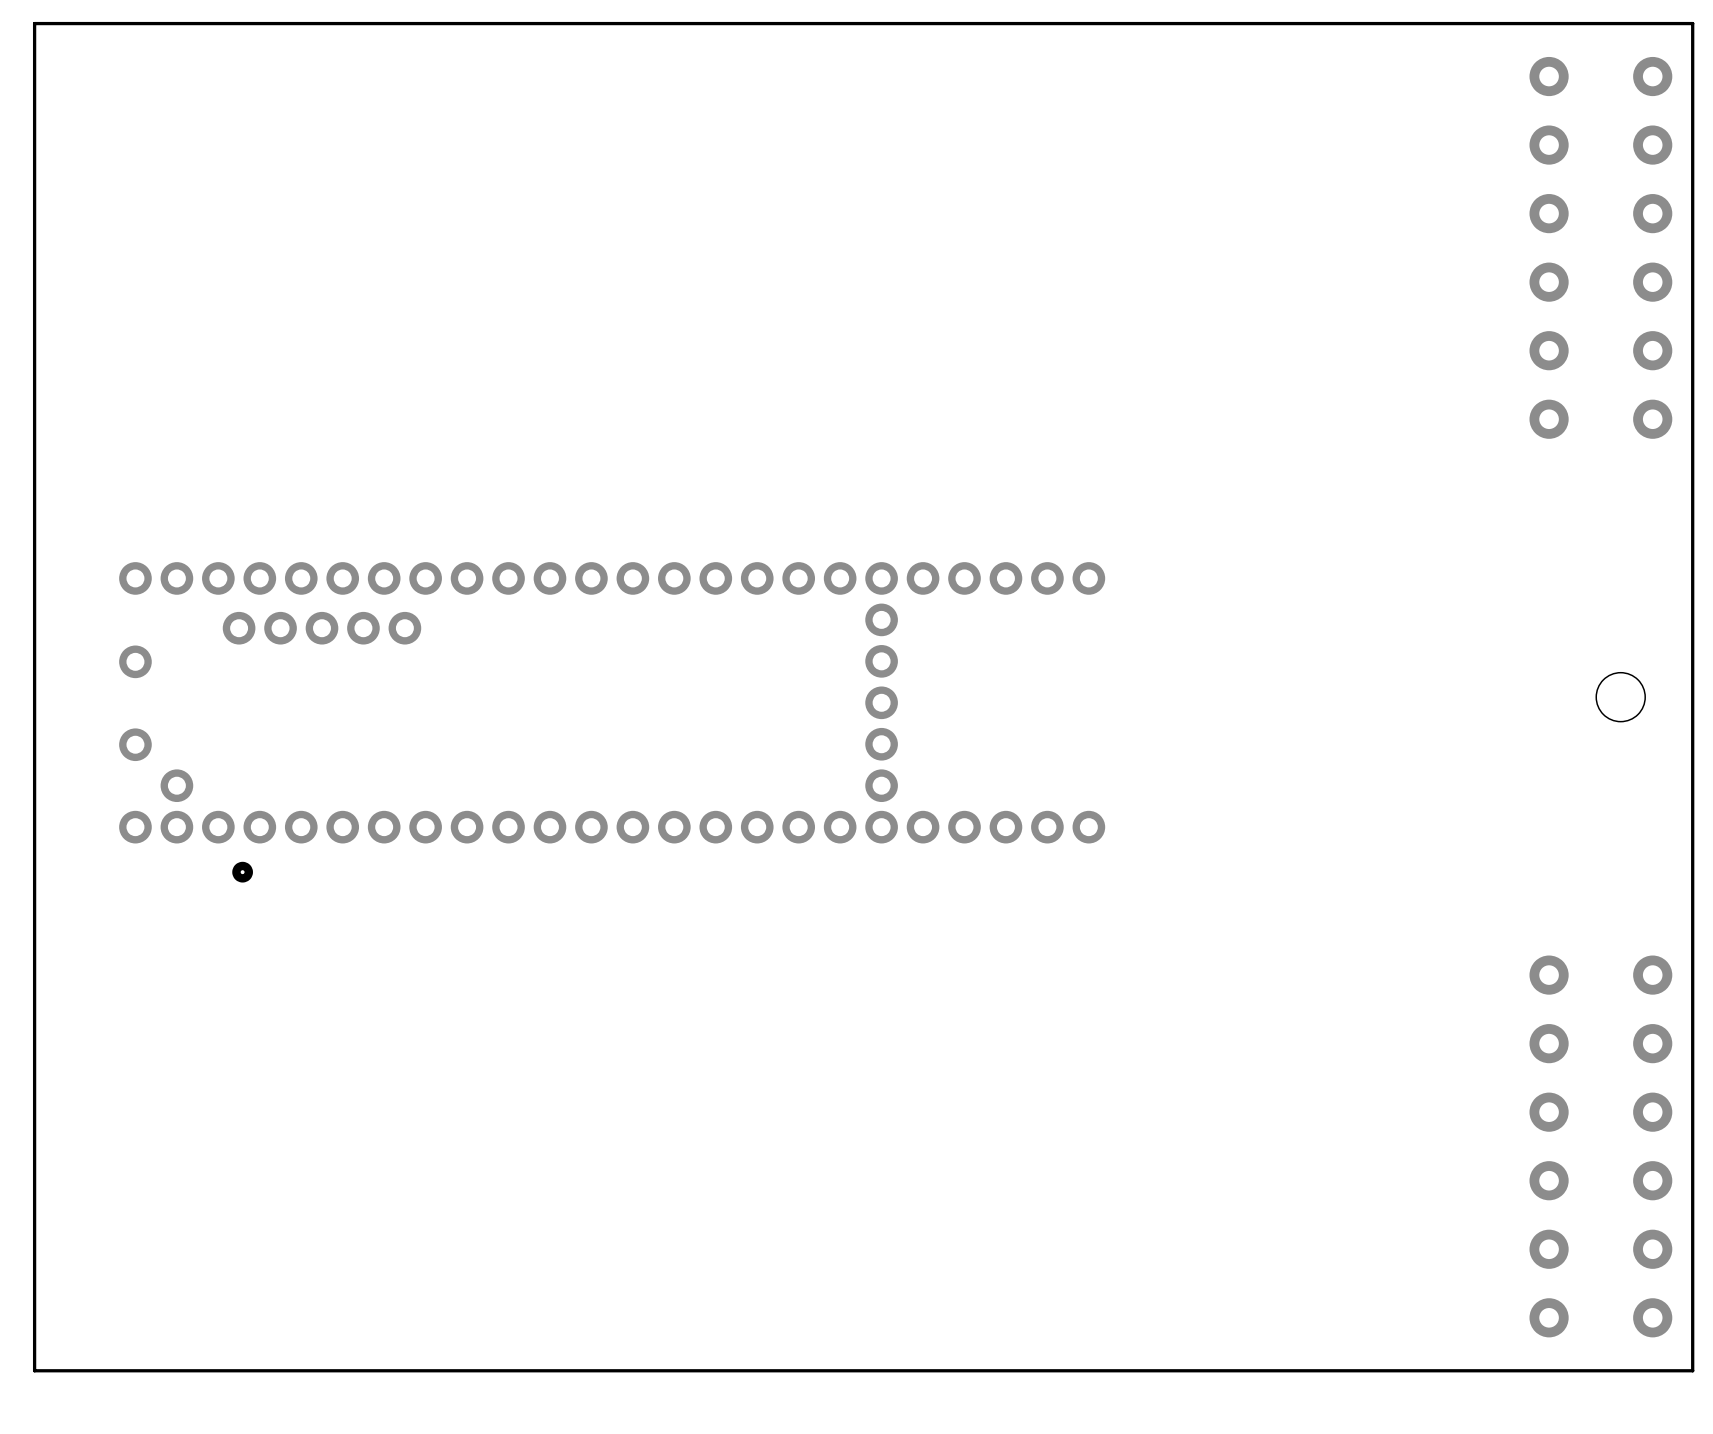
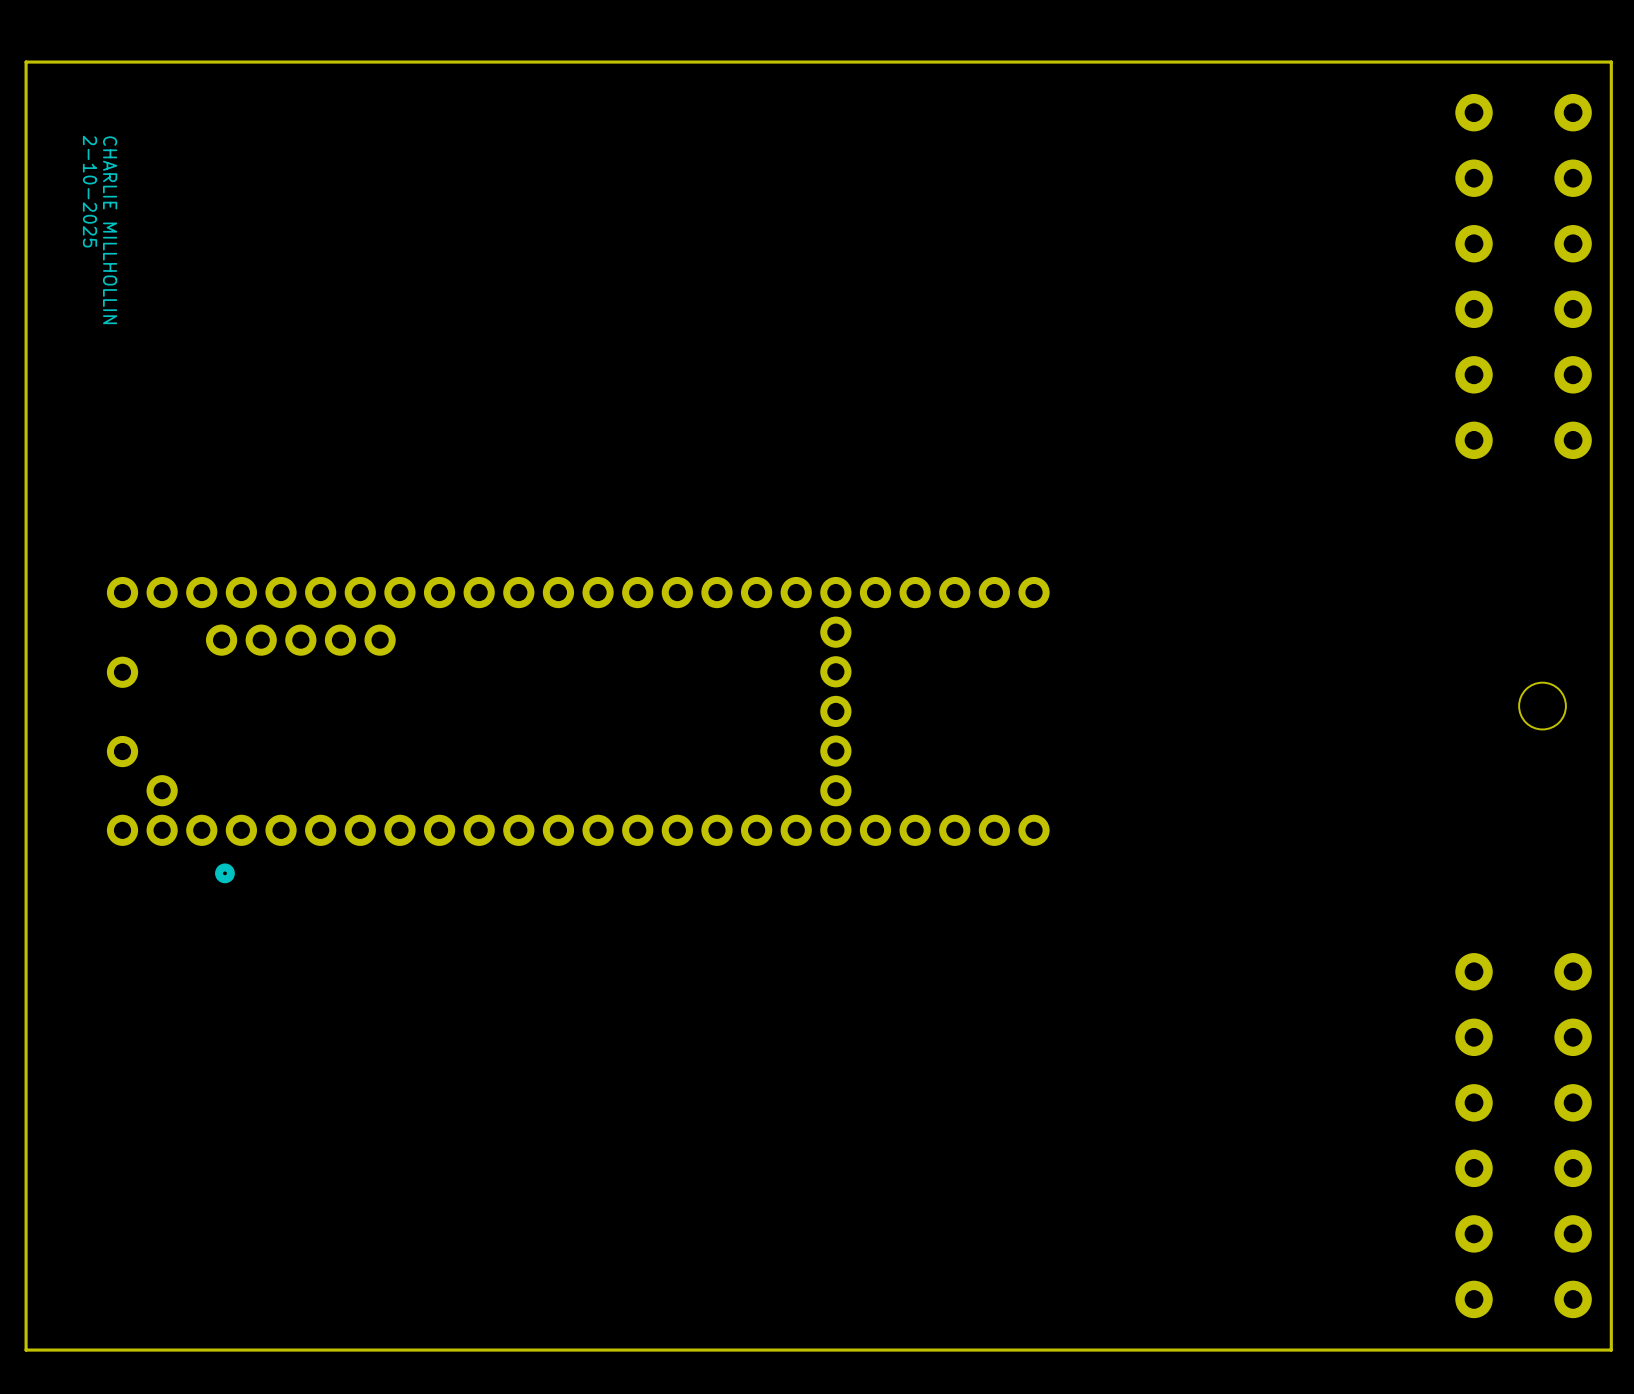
text: none -> 2-10-2025 (90, 191)
text: none -> CHARLIE MILLHOLLIN (110, 230)

